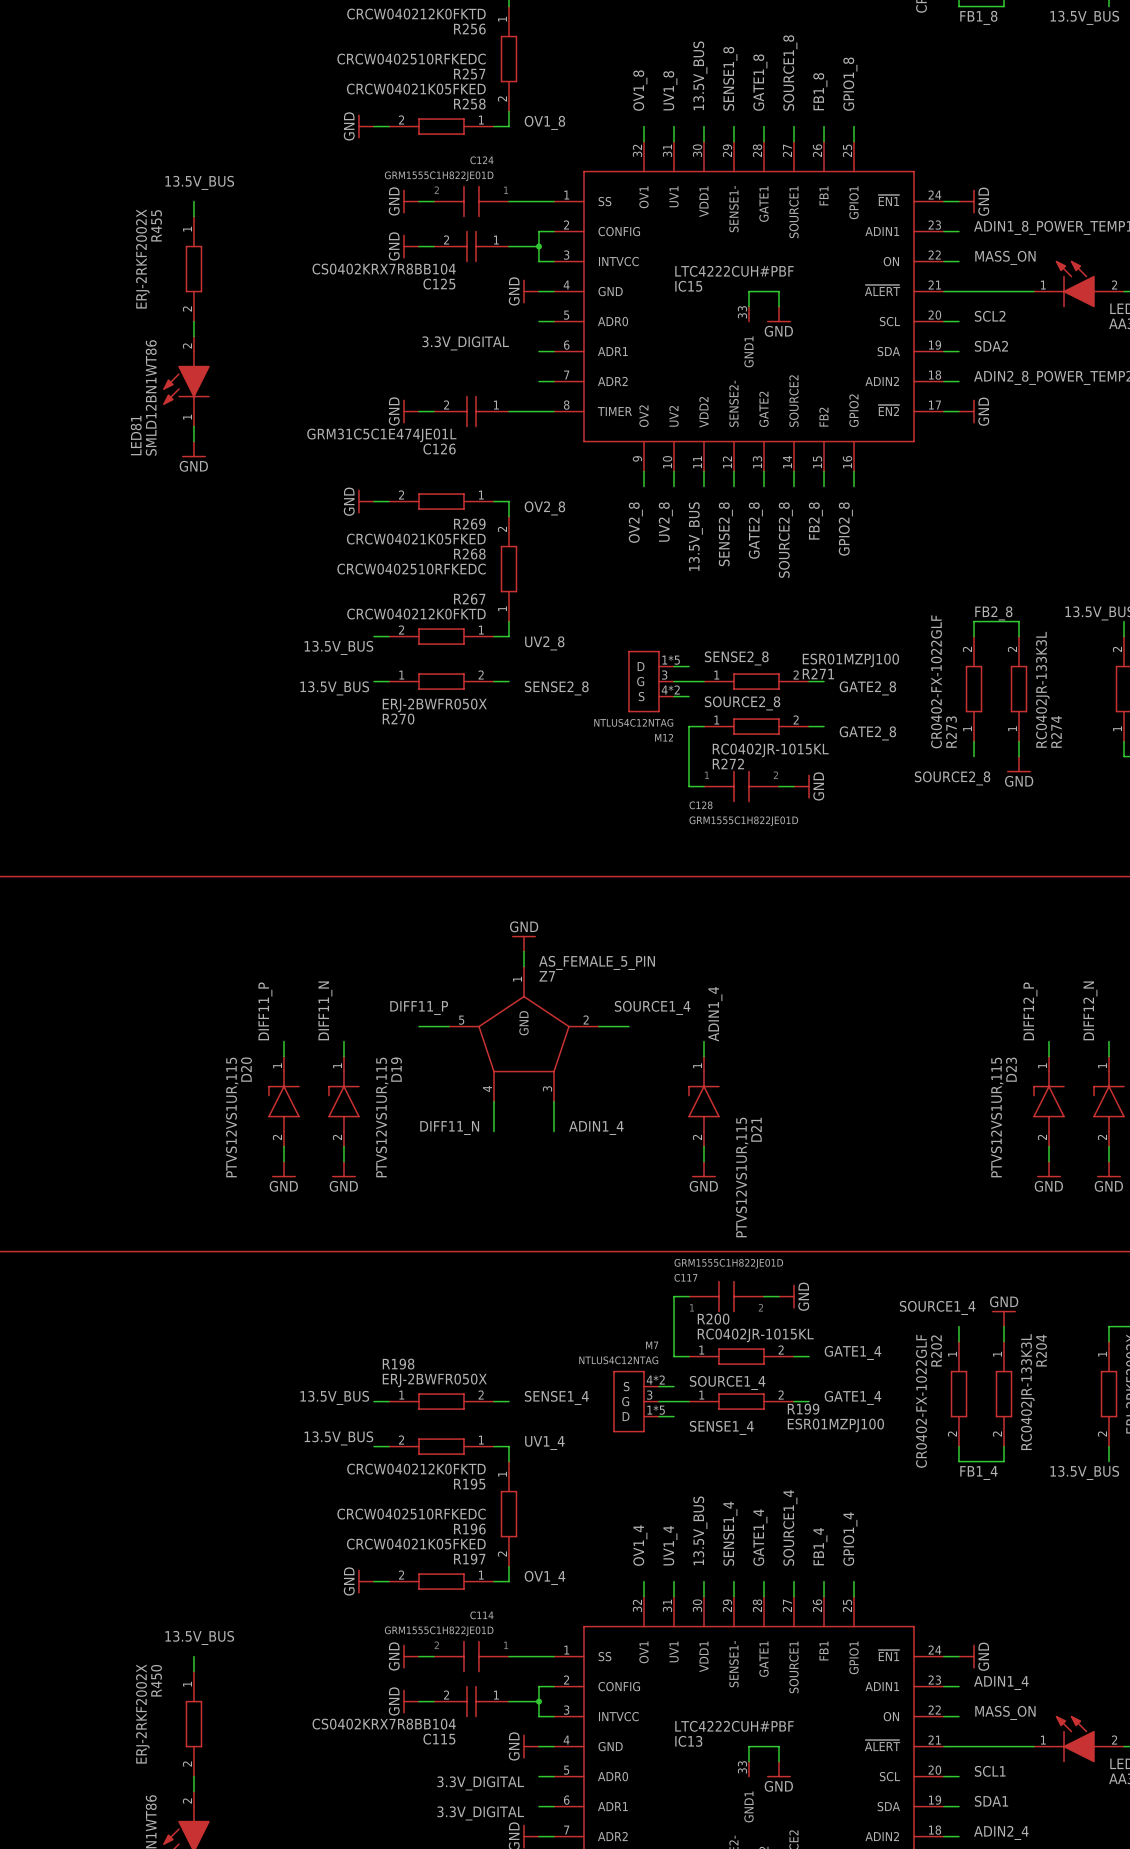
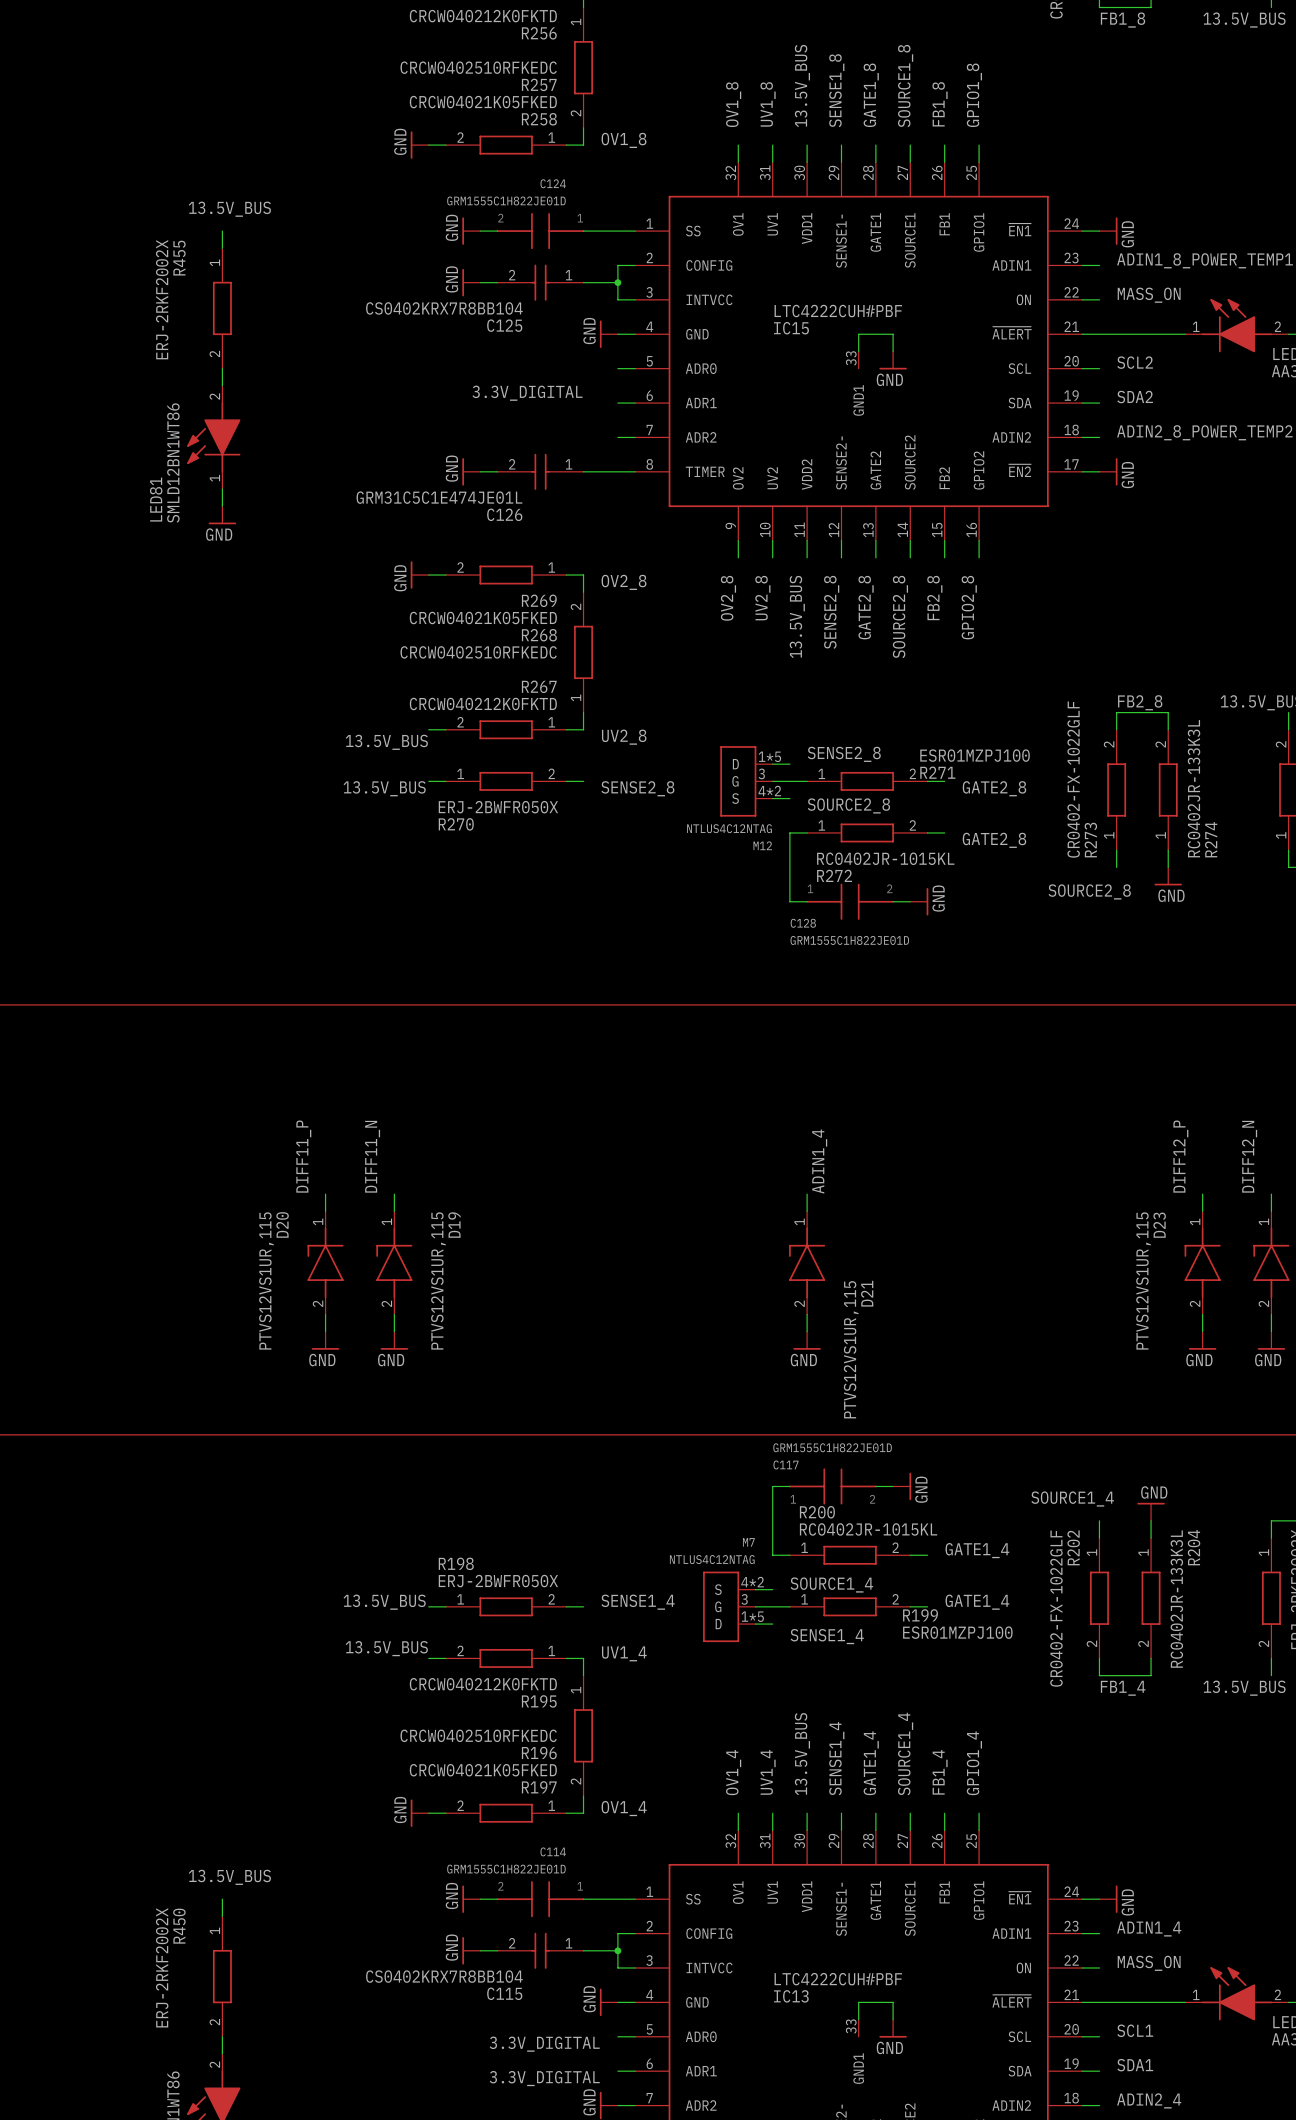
power symbol: GND (523, 943) -> none
wire: (523, 951) (523, 966) -> none
label: SOURCE1_4 (652, 1007) -> none
label: DIFF11_P (419, 1008) -> none
wire: (418, 1026) (448, 1026) -> none
wire: (598, 1026) (628, 1026) -> none
Z7: AS_FEMALE_5_PIN (523, 1034) -> none
wire: (493, 1101) (493, 1131) -> none
wire: (553, 1101) (553, 1131) -> none
label: DIFF11_N (449, 1128) -> none
label: ADIN1_4 (596, 1128) -> none

